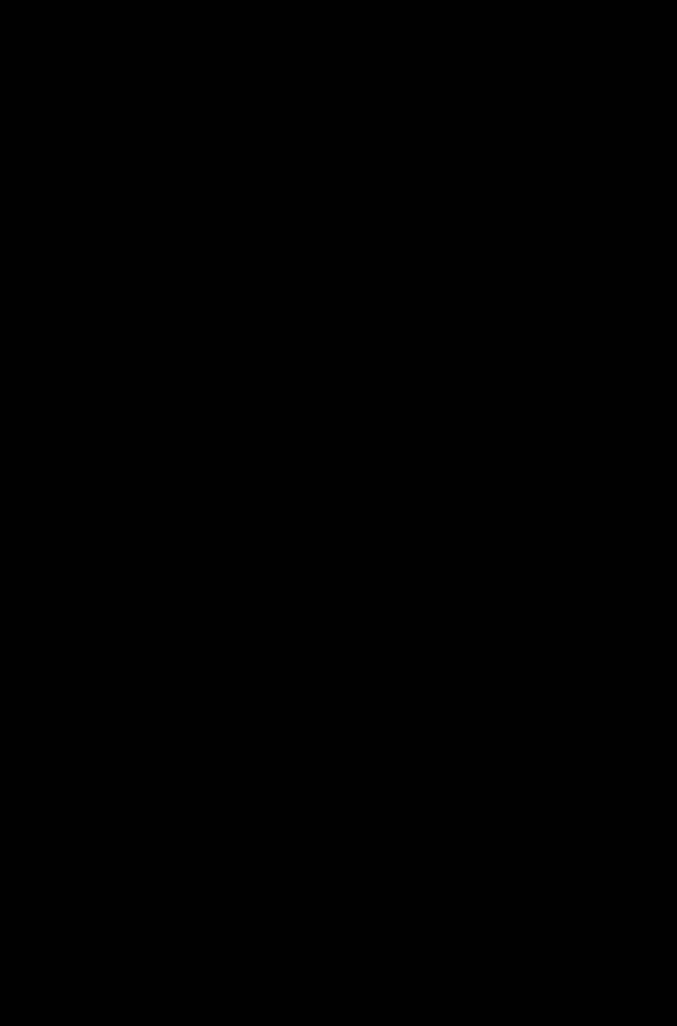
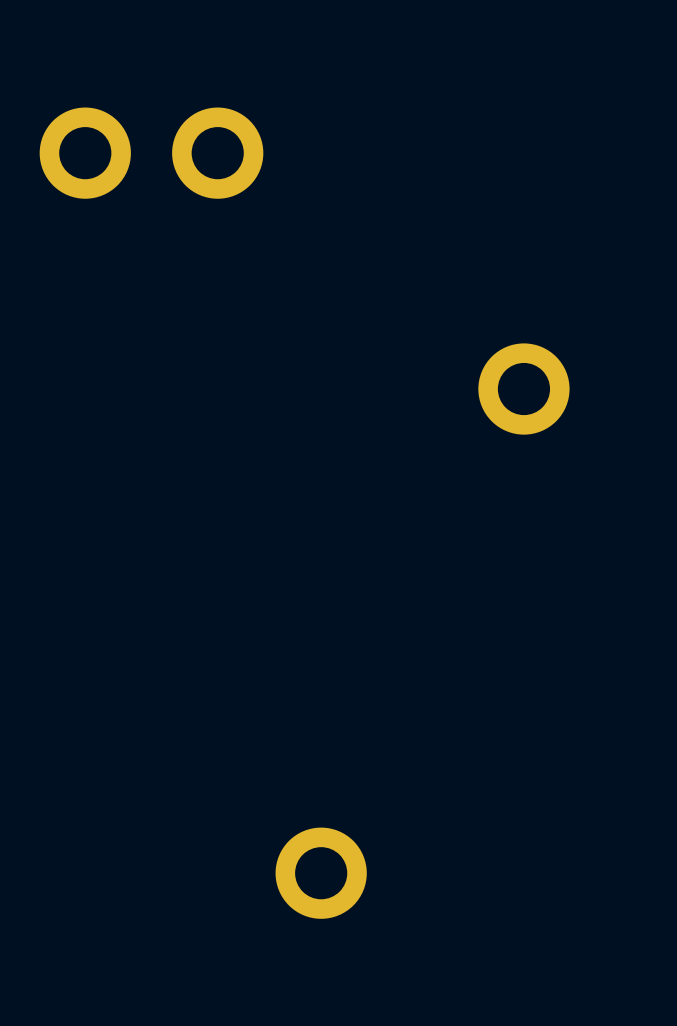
part: none -> (85, 153)
part: none -> (217, 153)
part: none -> (523, 389)
part: none -> (321, 873)

